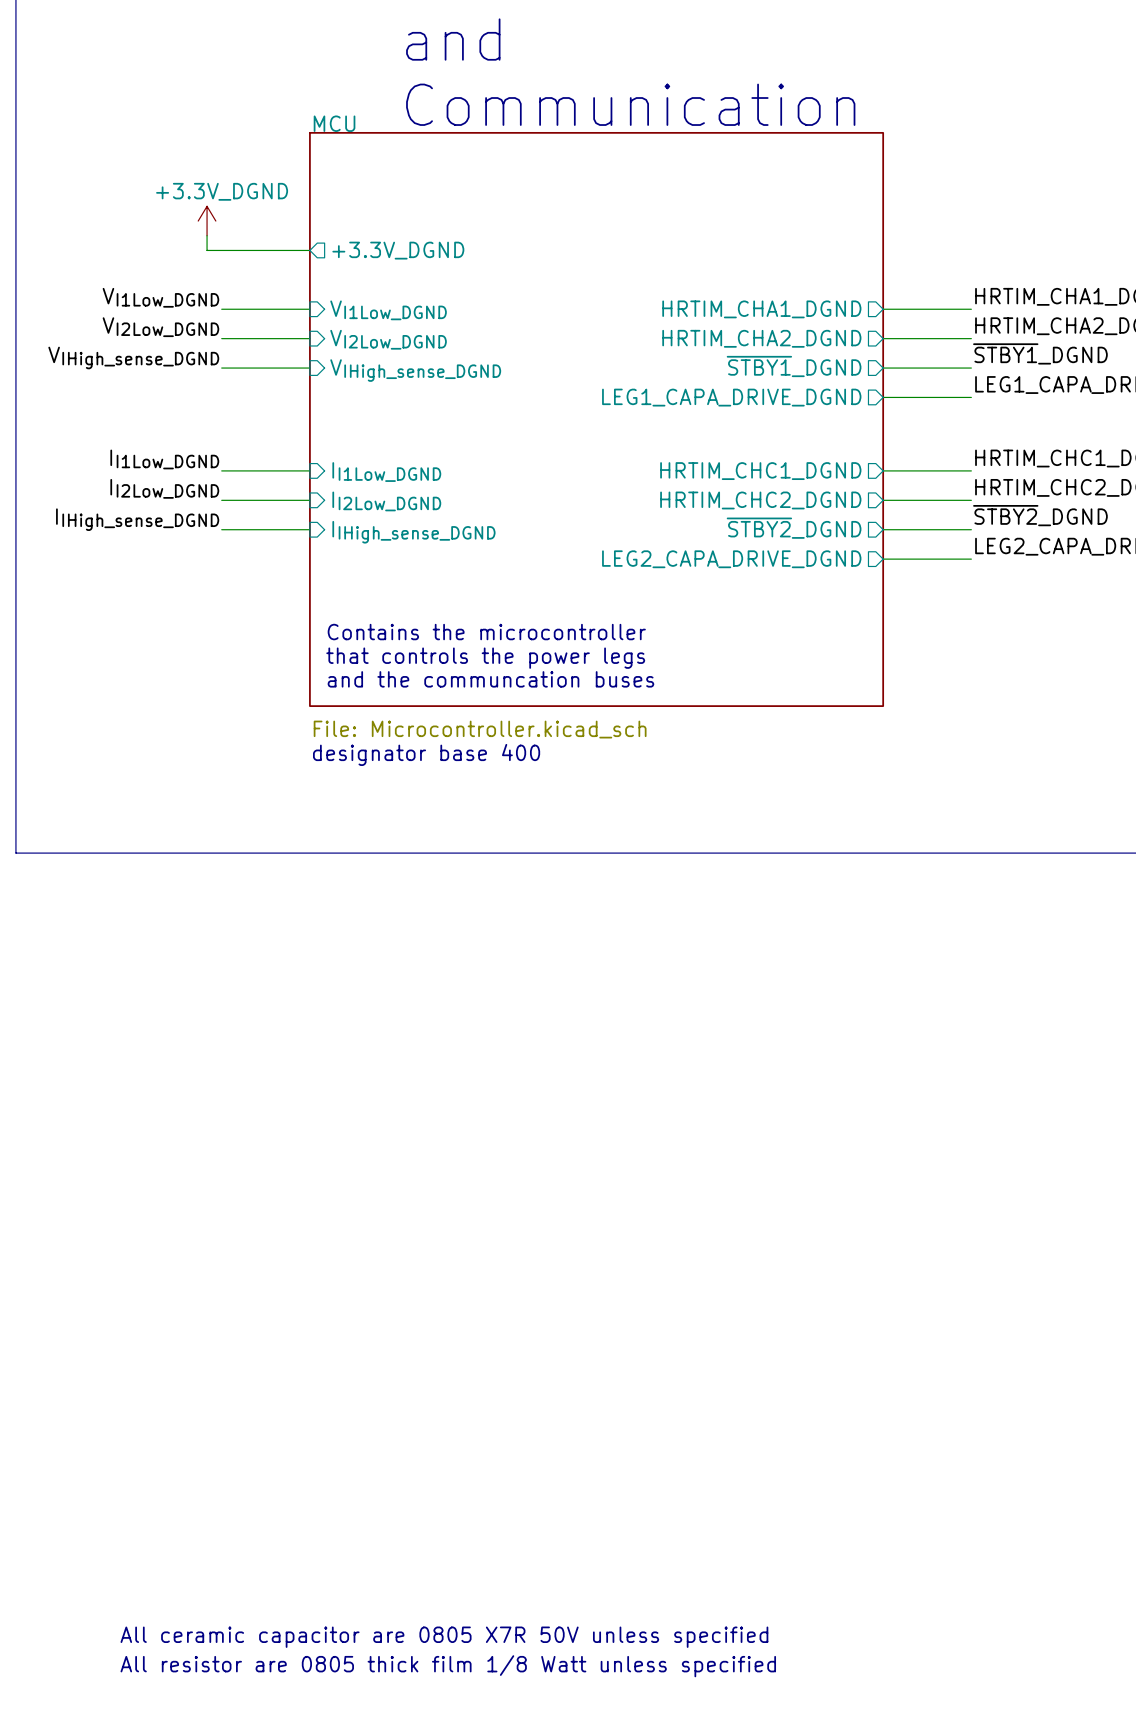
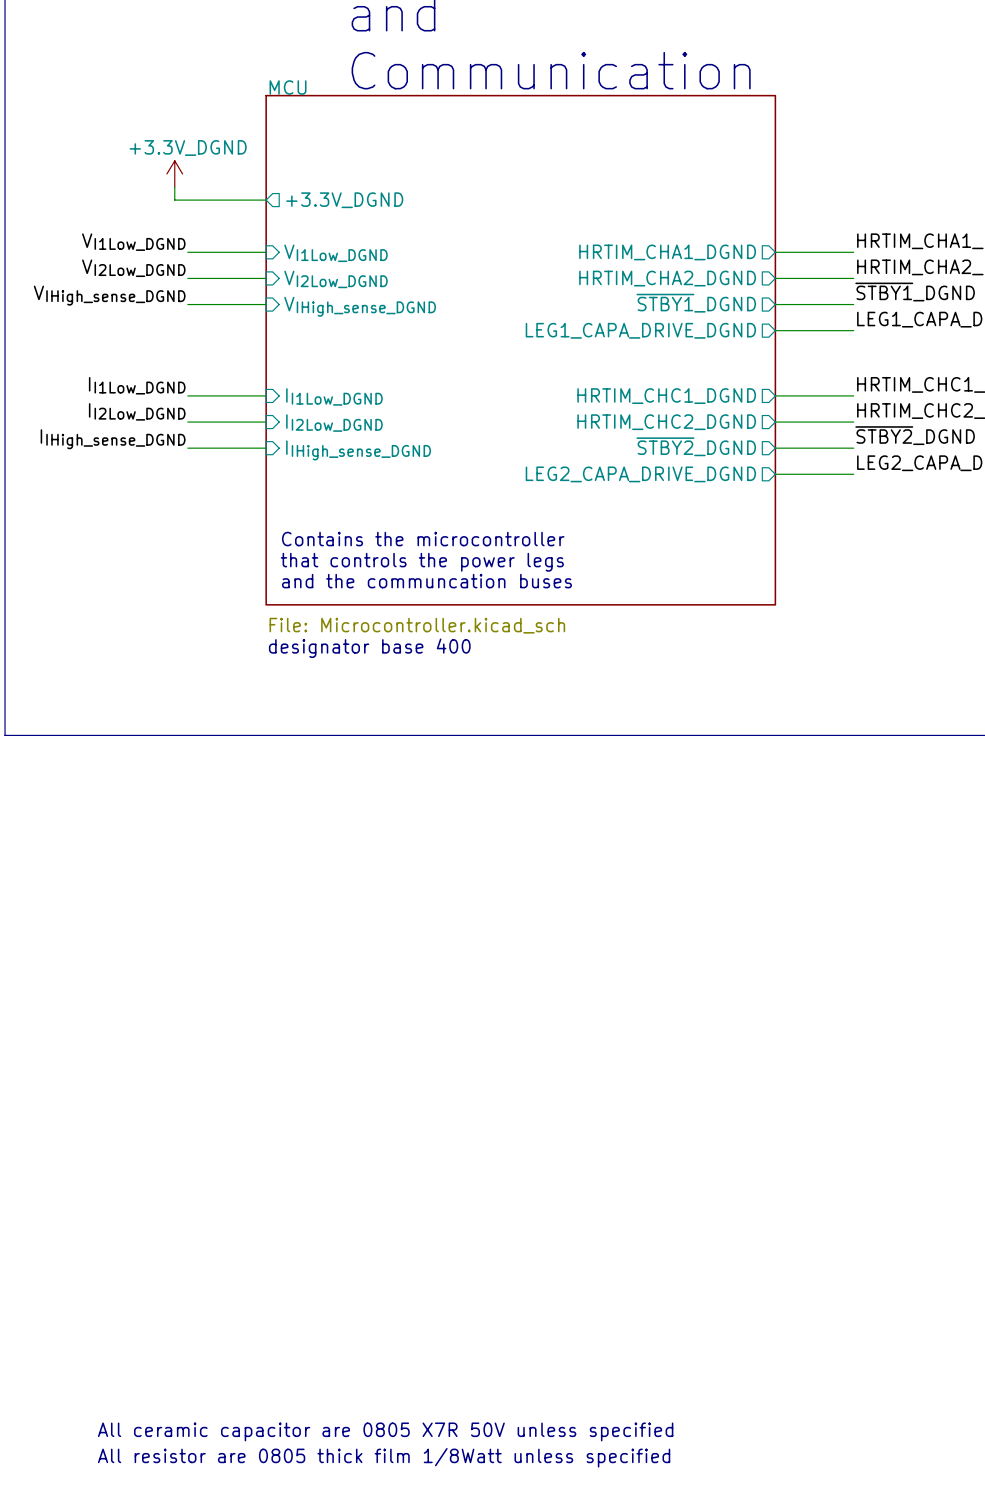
text: All resistor are 0805 thick film 1/8 Watt unless specified (448, 1666) -> All resistor are 0805 thick film 1/8Watt unless specified (384, 1457)

